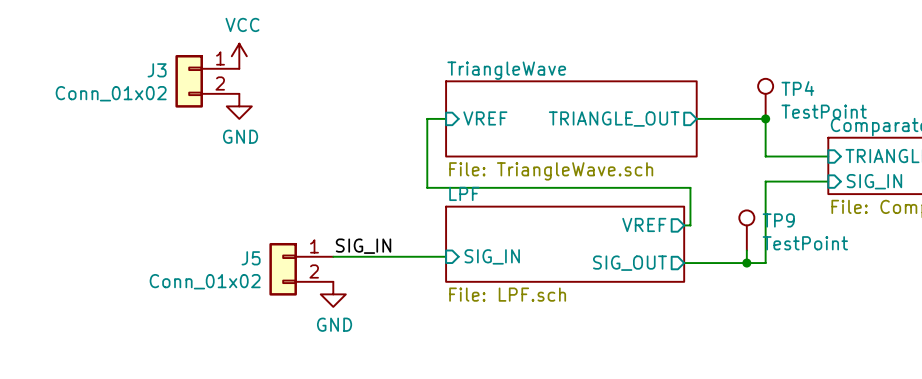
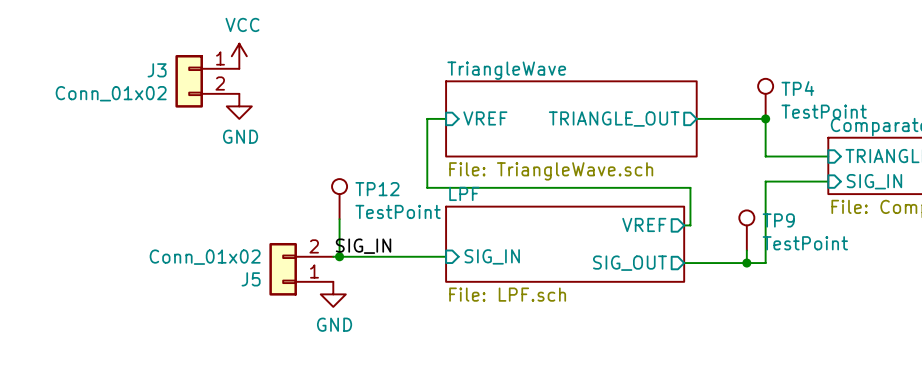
TP12: none -> TestPoint (339, 199)
wire: none -> (339, 219) (339, 256)
junction: none -> (339, 256)
J5 flip: as is (283, 269) -> up-down (283, 269)

